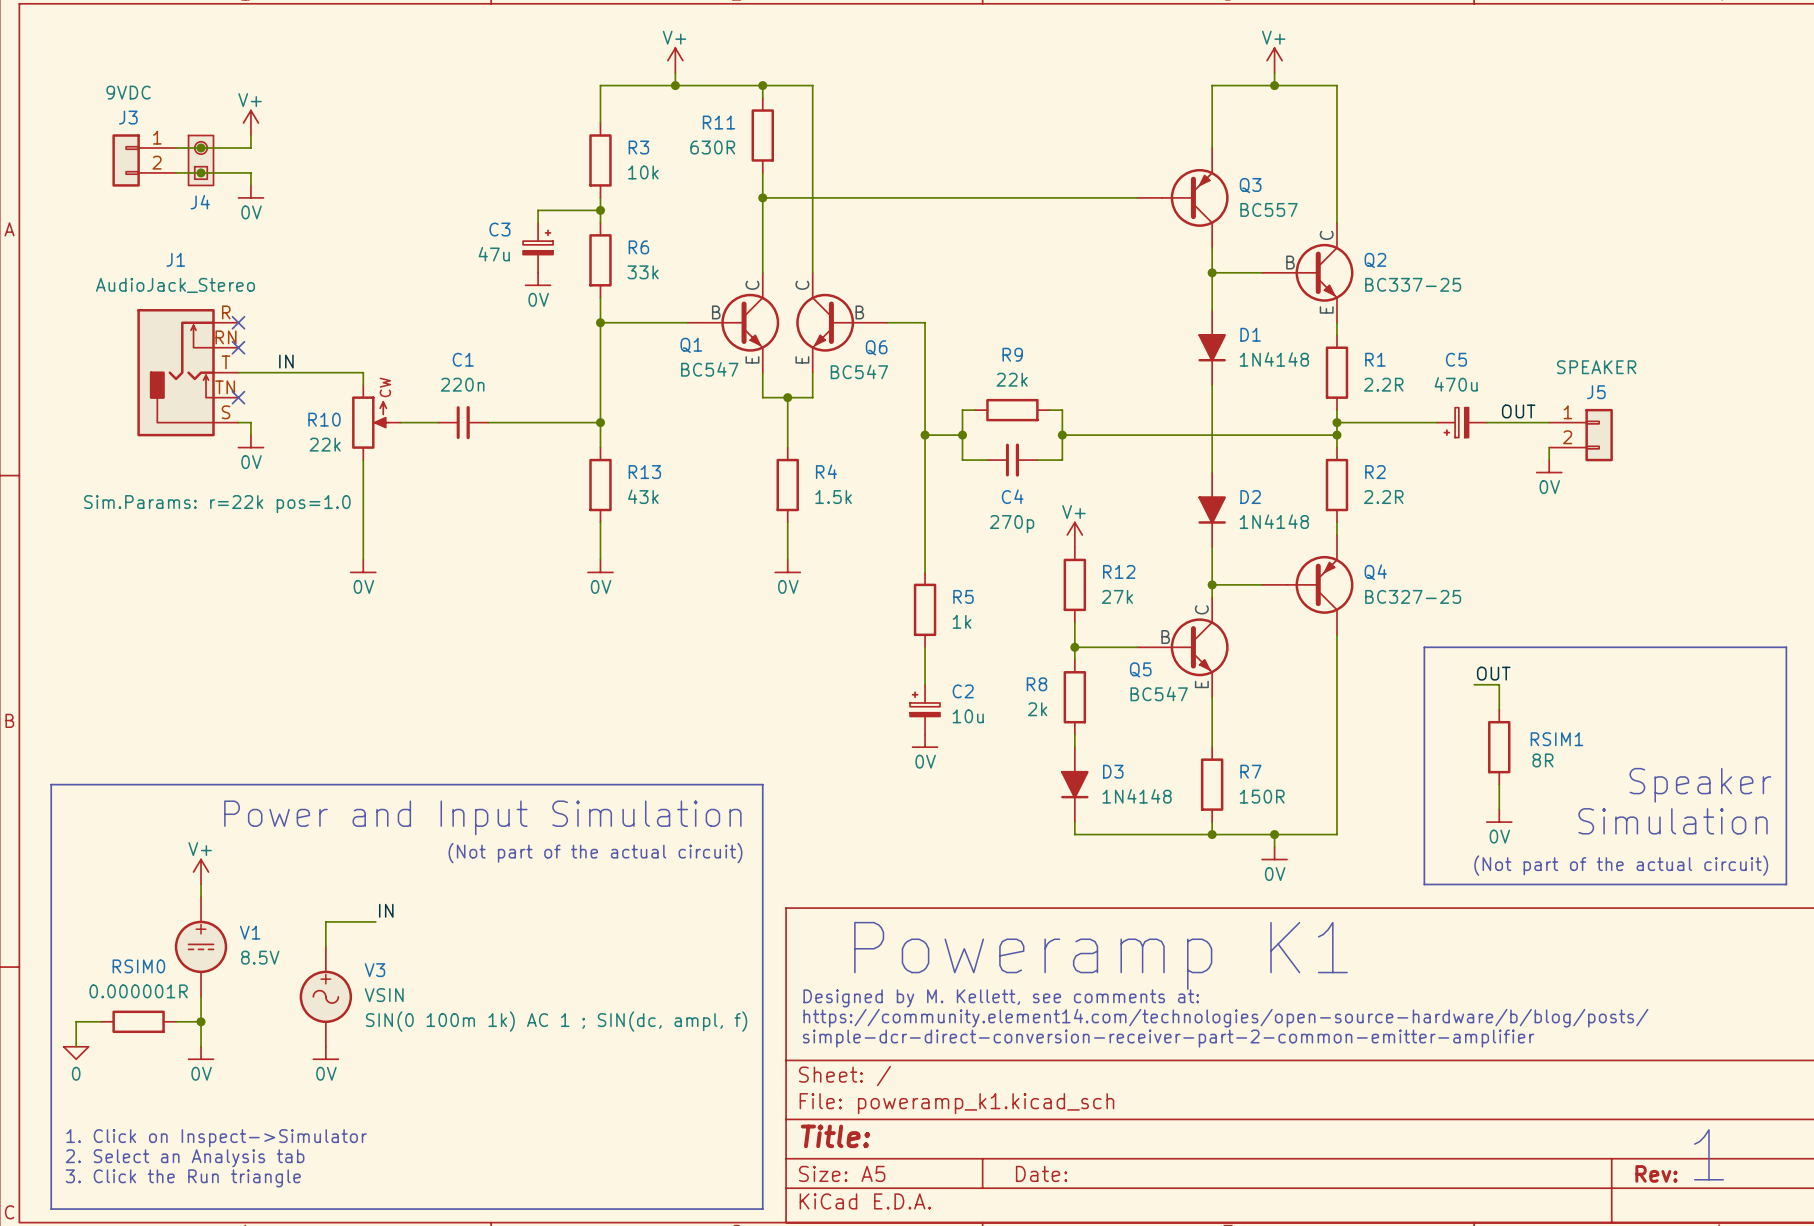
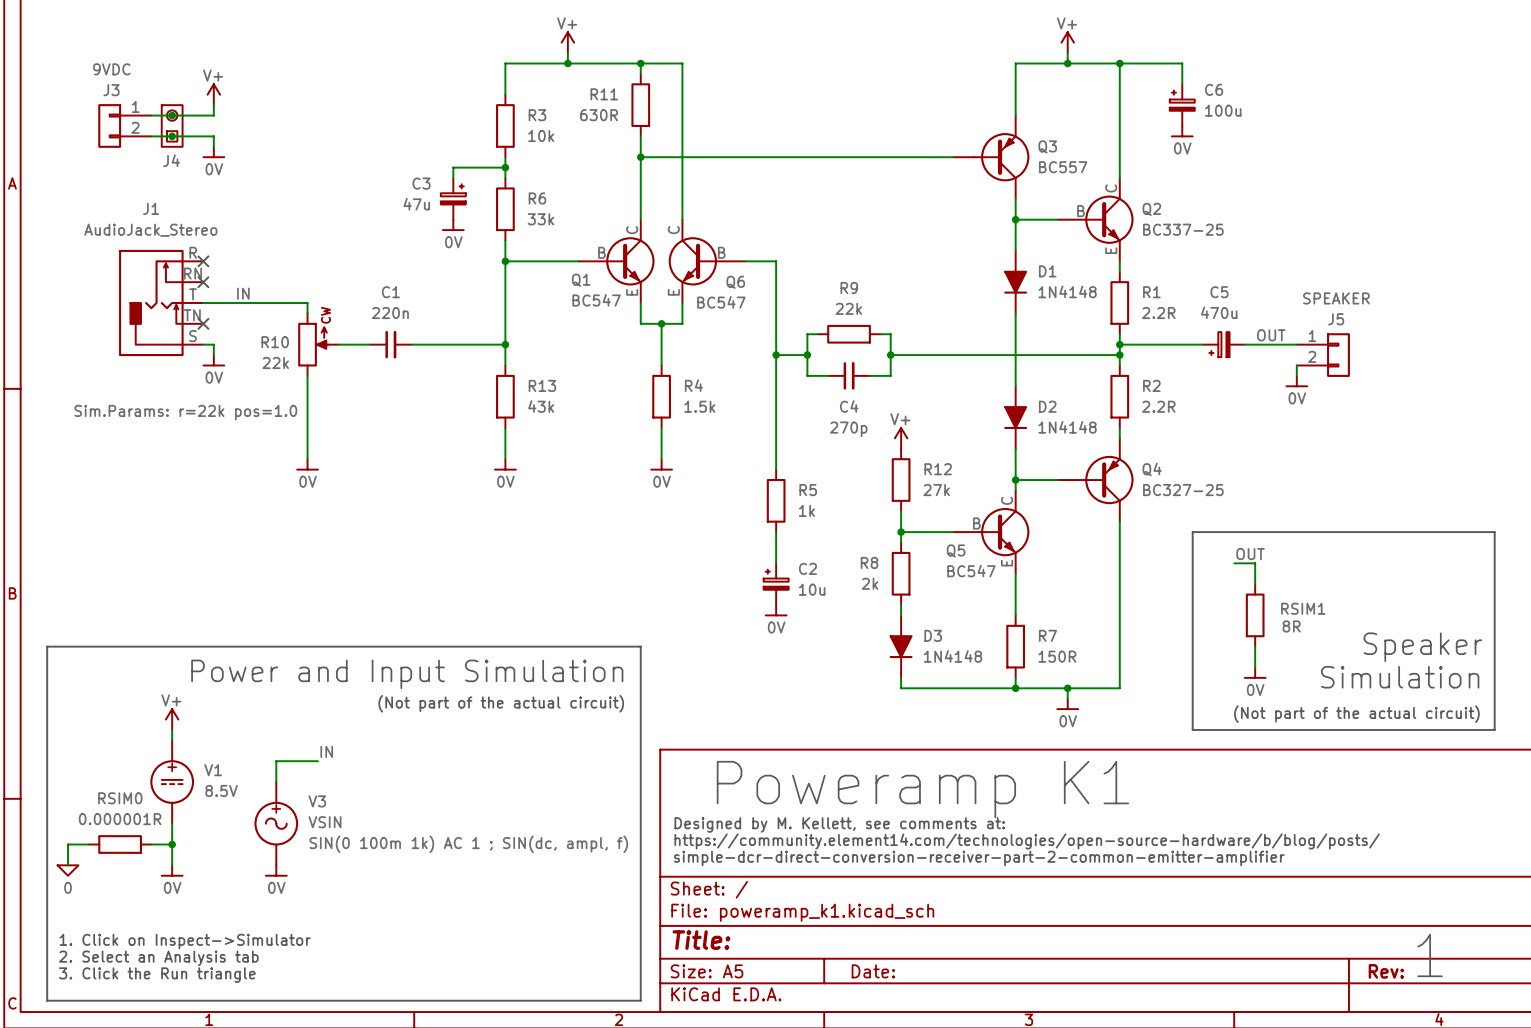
wire: none -> (1119, 63) (1182, 63) (1182, 84)
junction: none -> (1119, 63)
C6: none -> 100u (1182, 105)
power symbol: none -> 0V (1182, 131)

